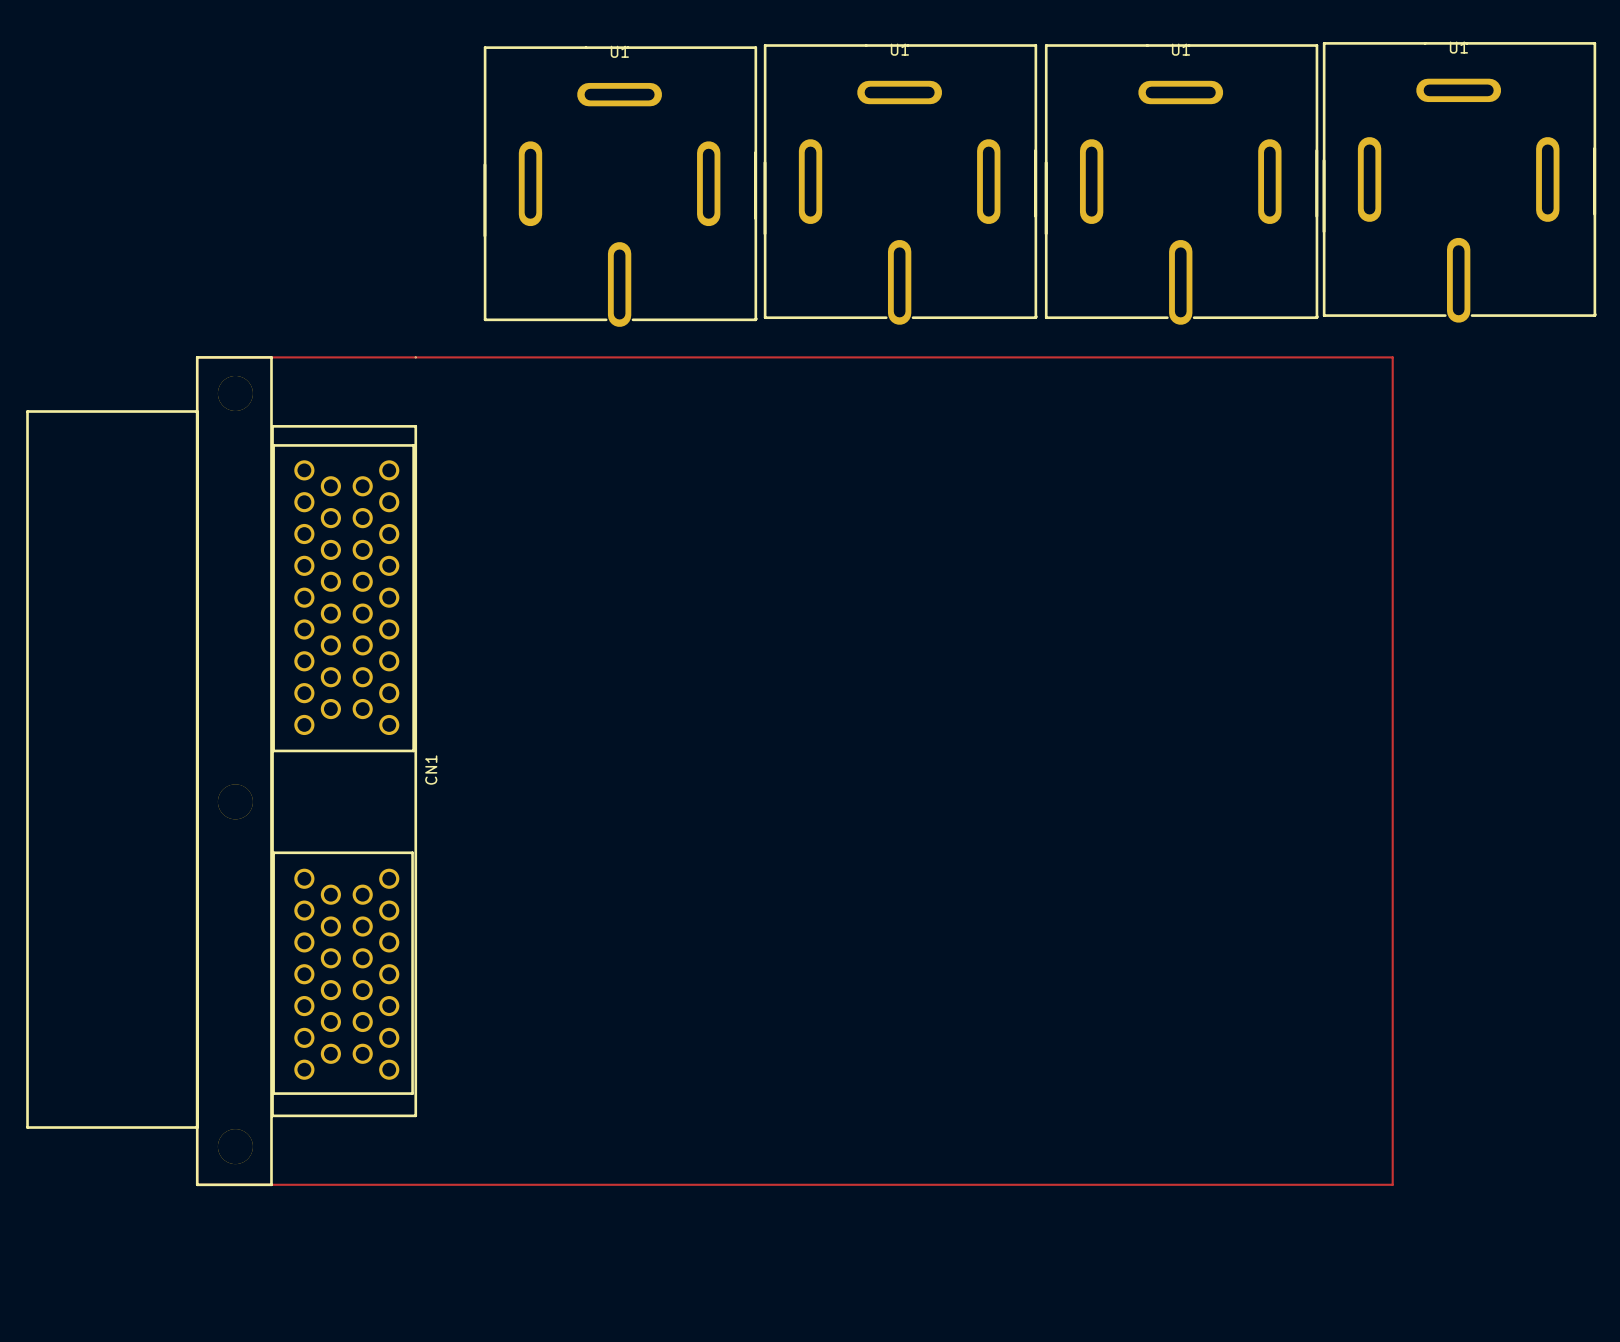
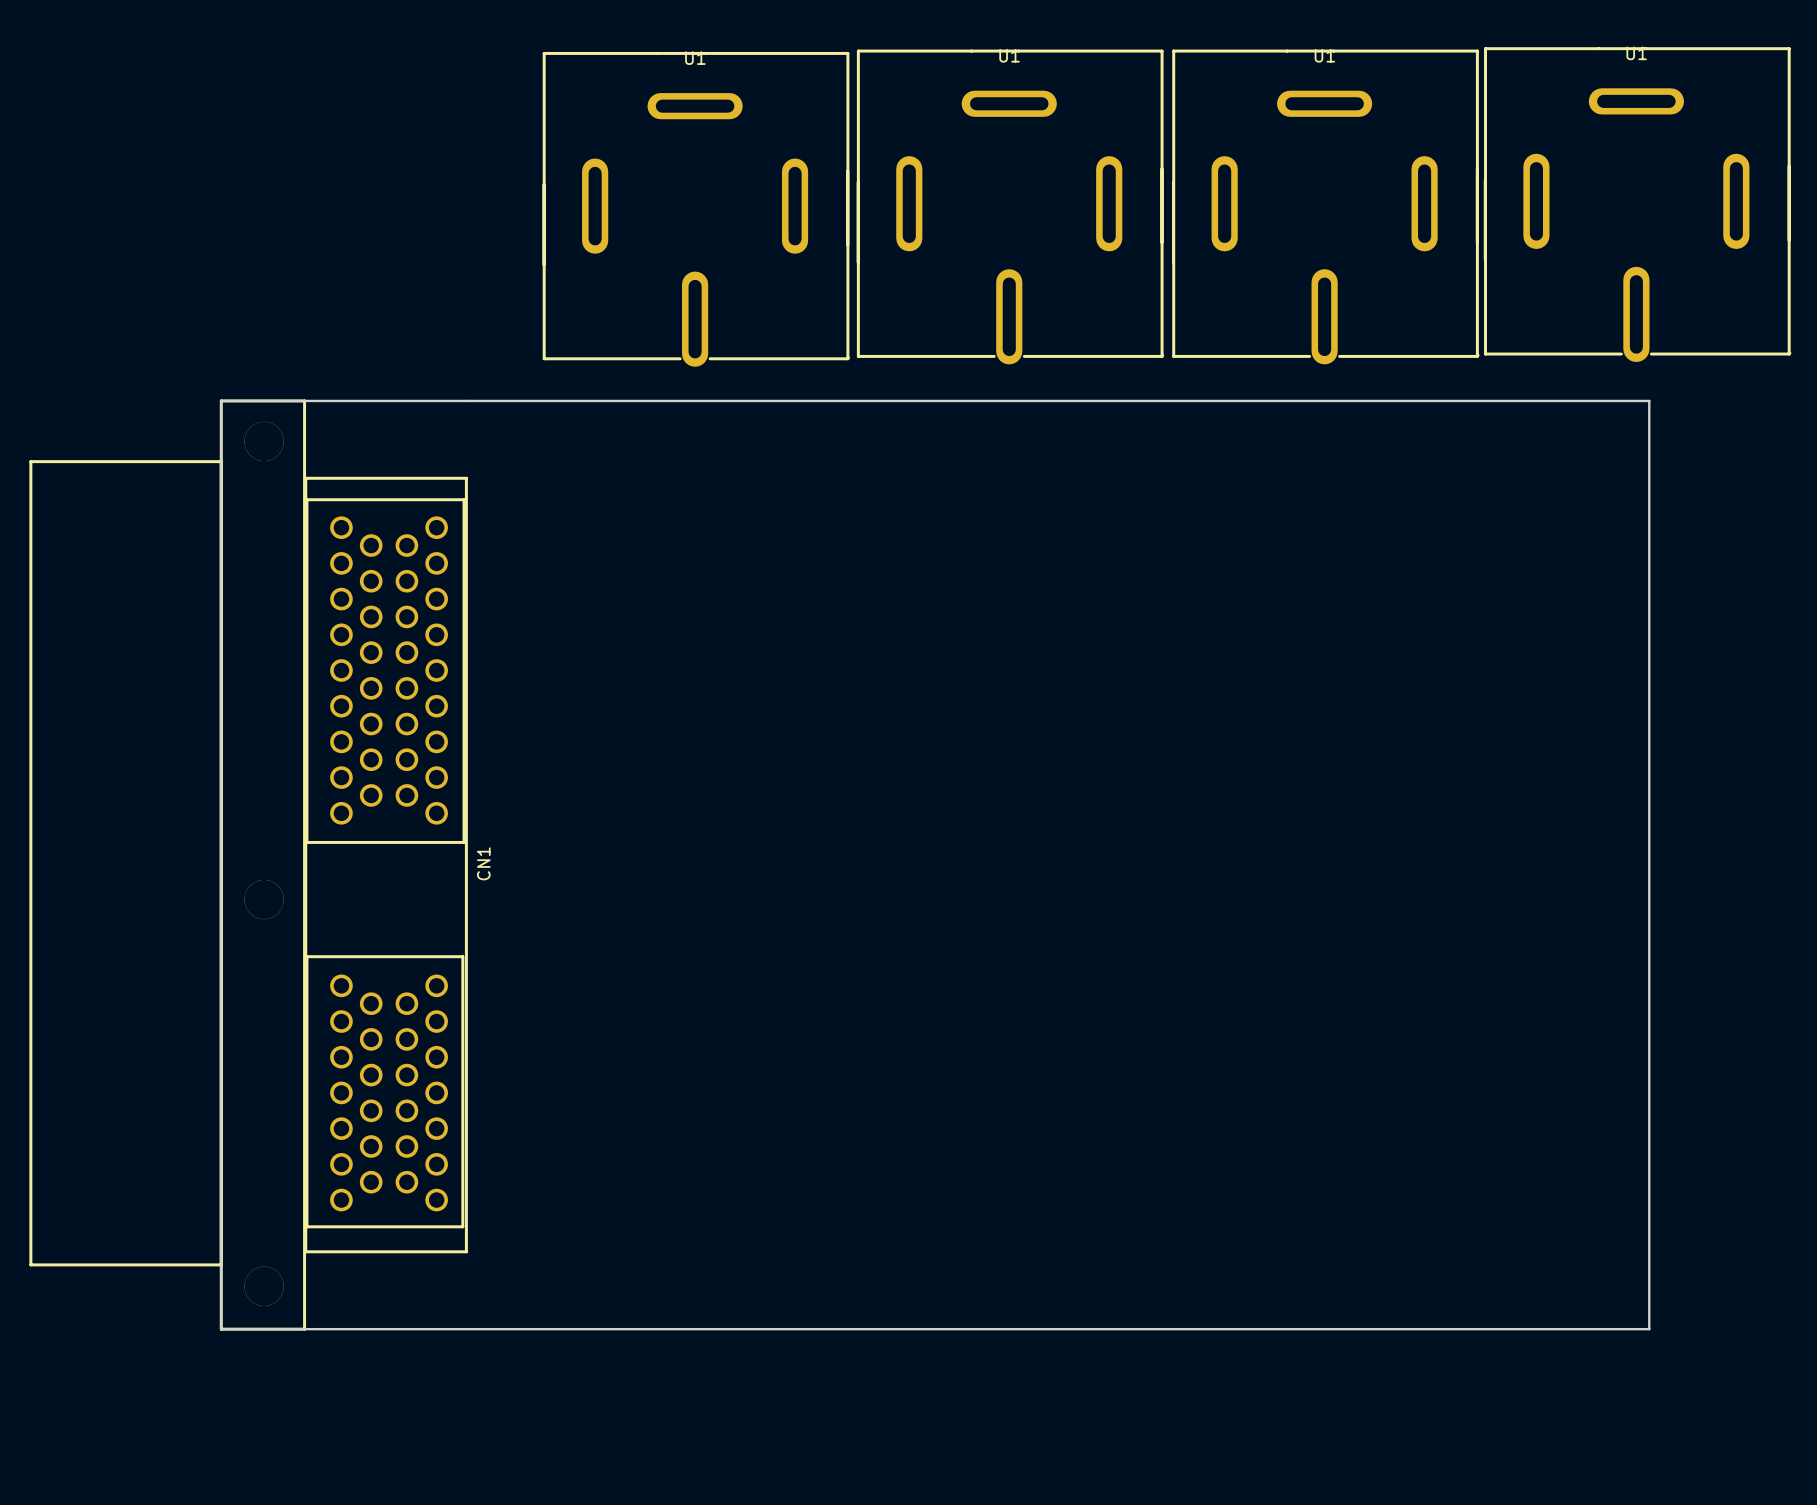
top track: (197, 357) (1392, 357) (1392, 1184) (197, 1184) (197, 357) -> none
board edge: none -> (221, 400) (1649, 400) (1649, 1329) (221, 1329) (221, 400)

